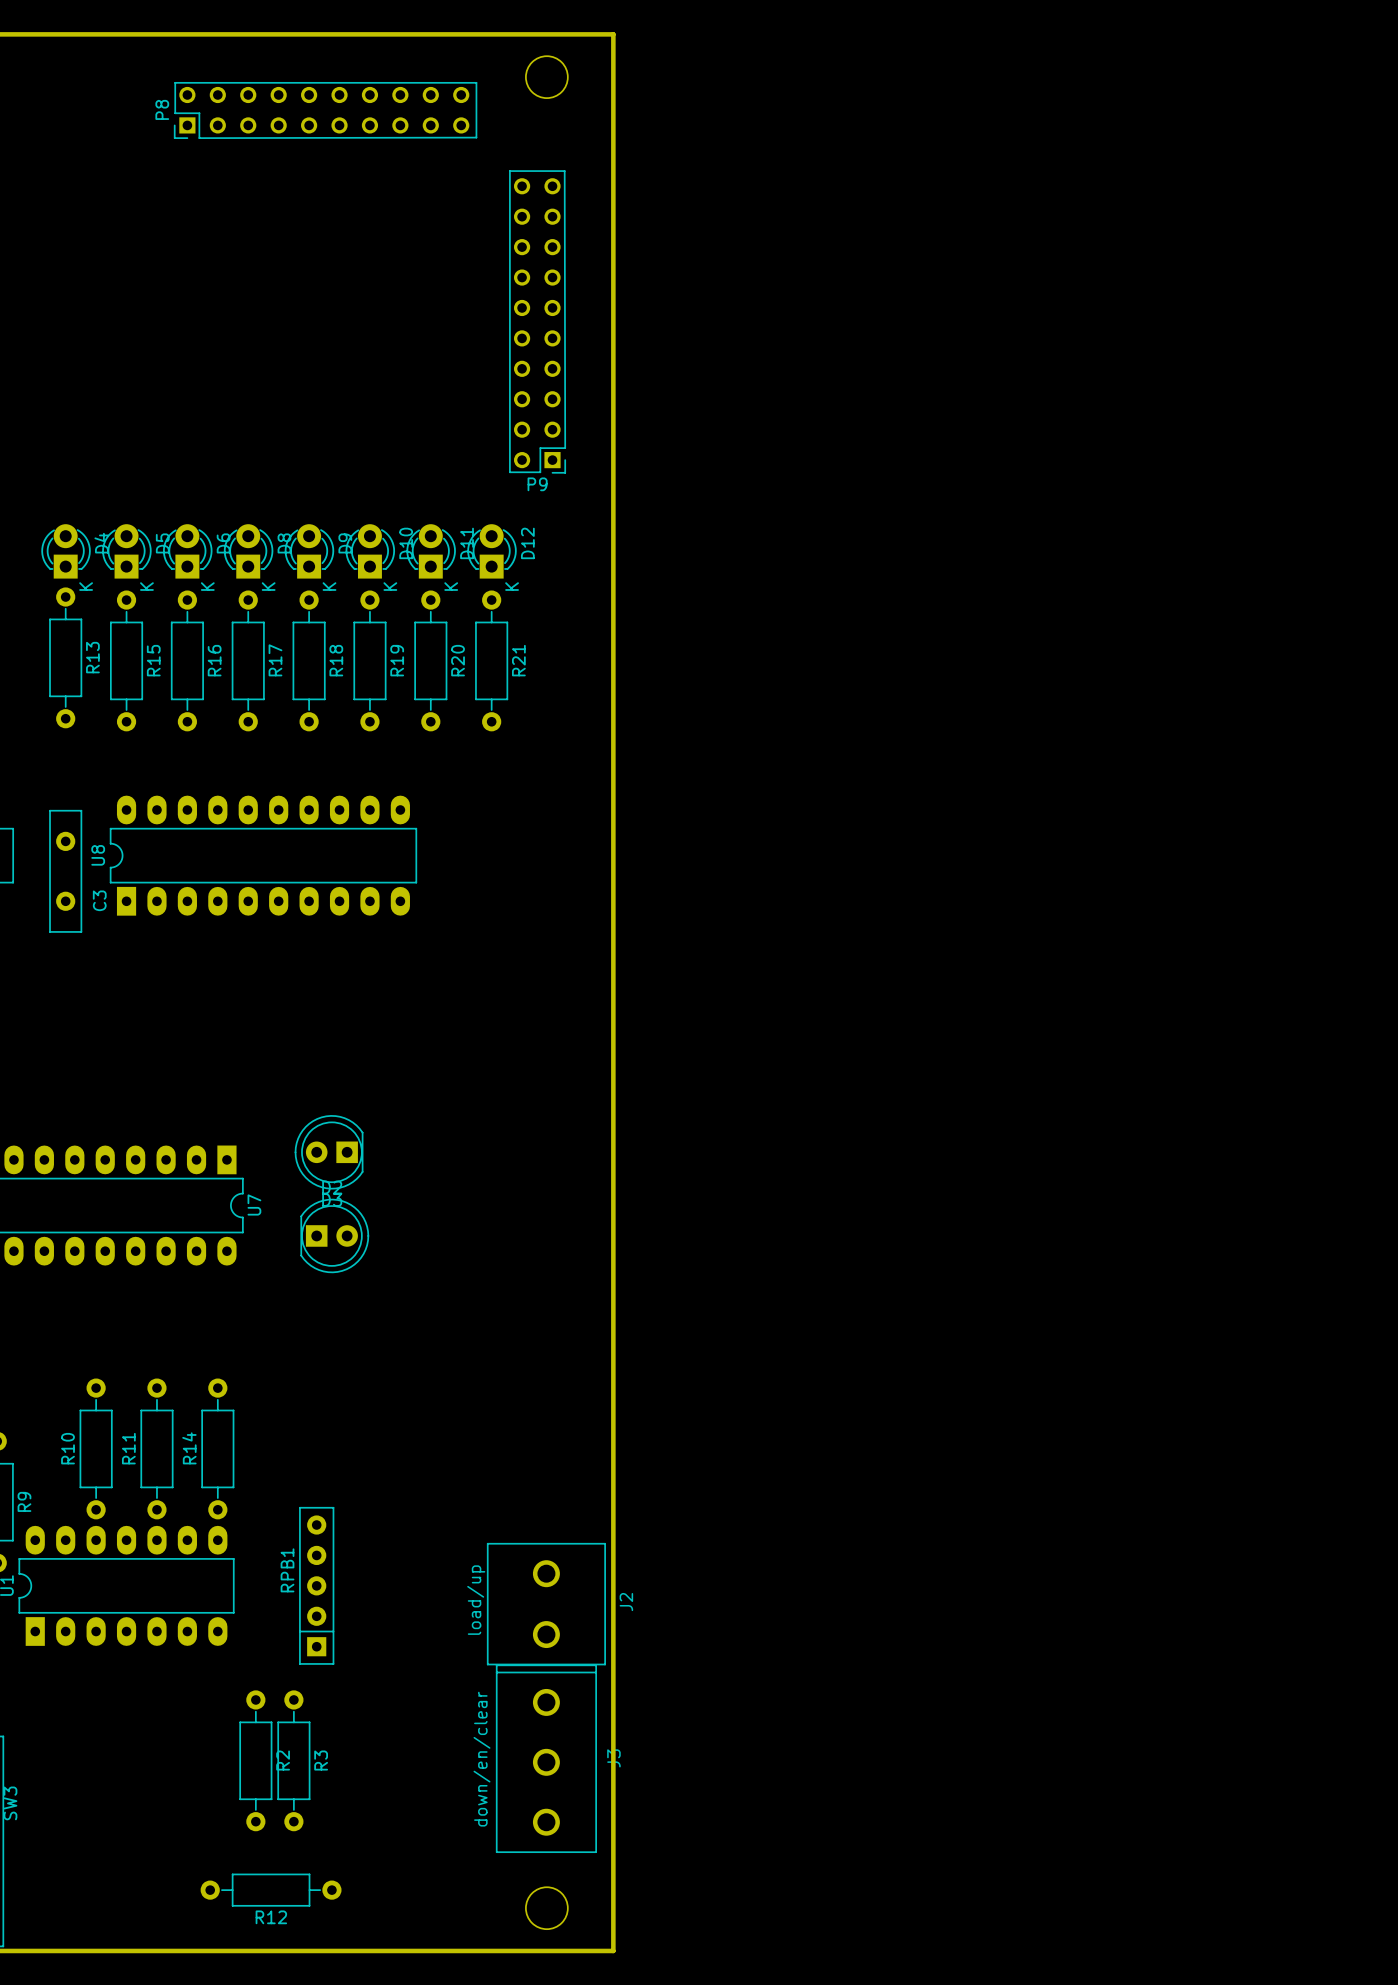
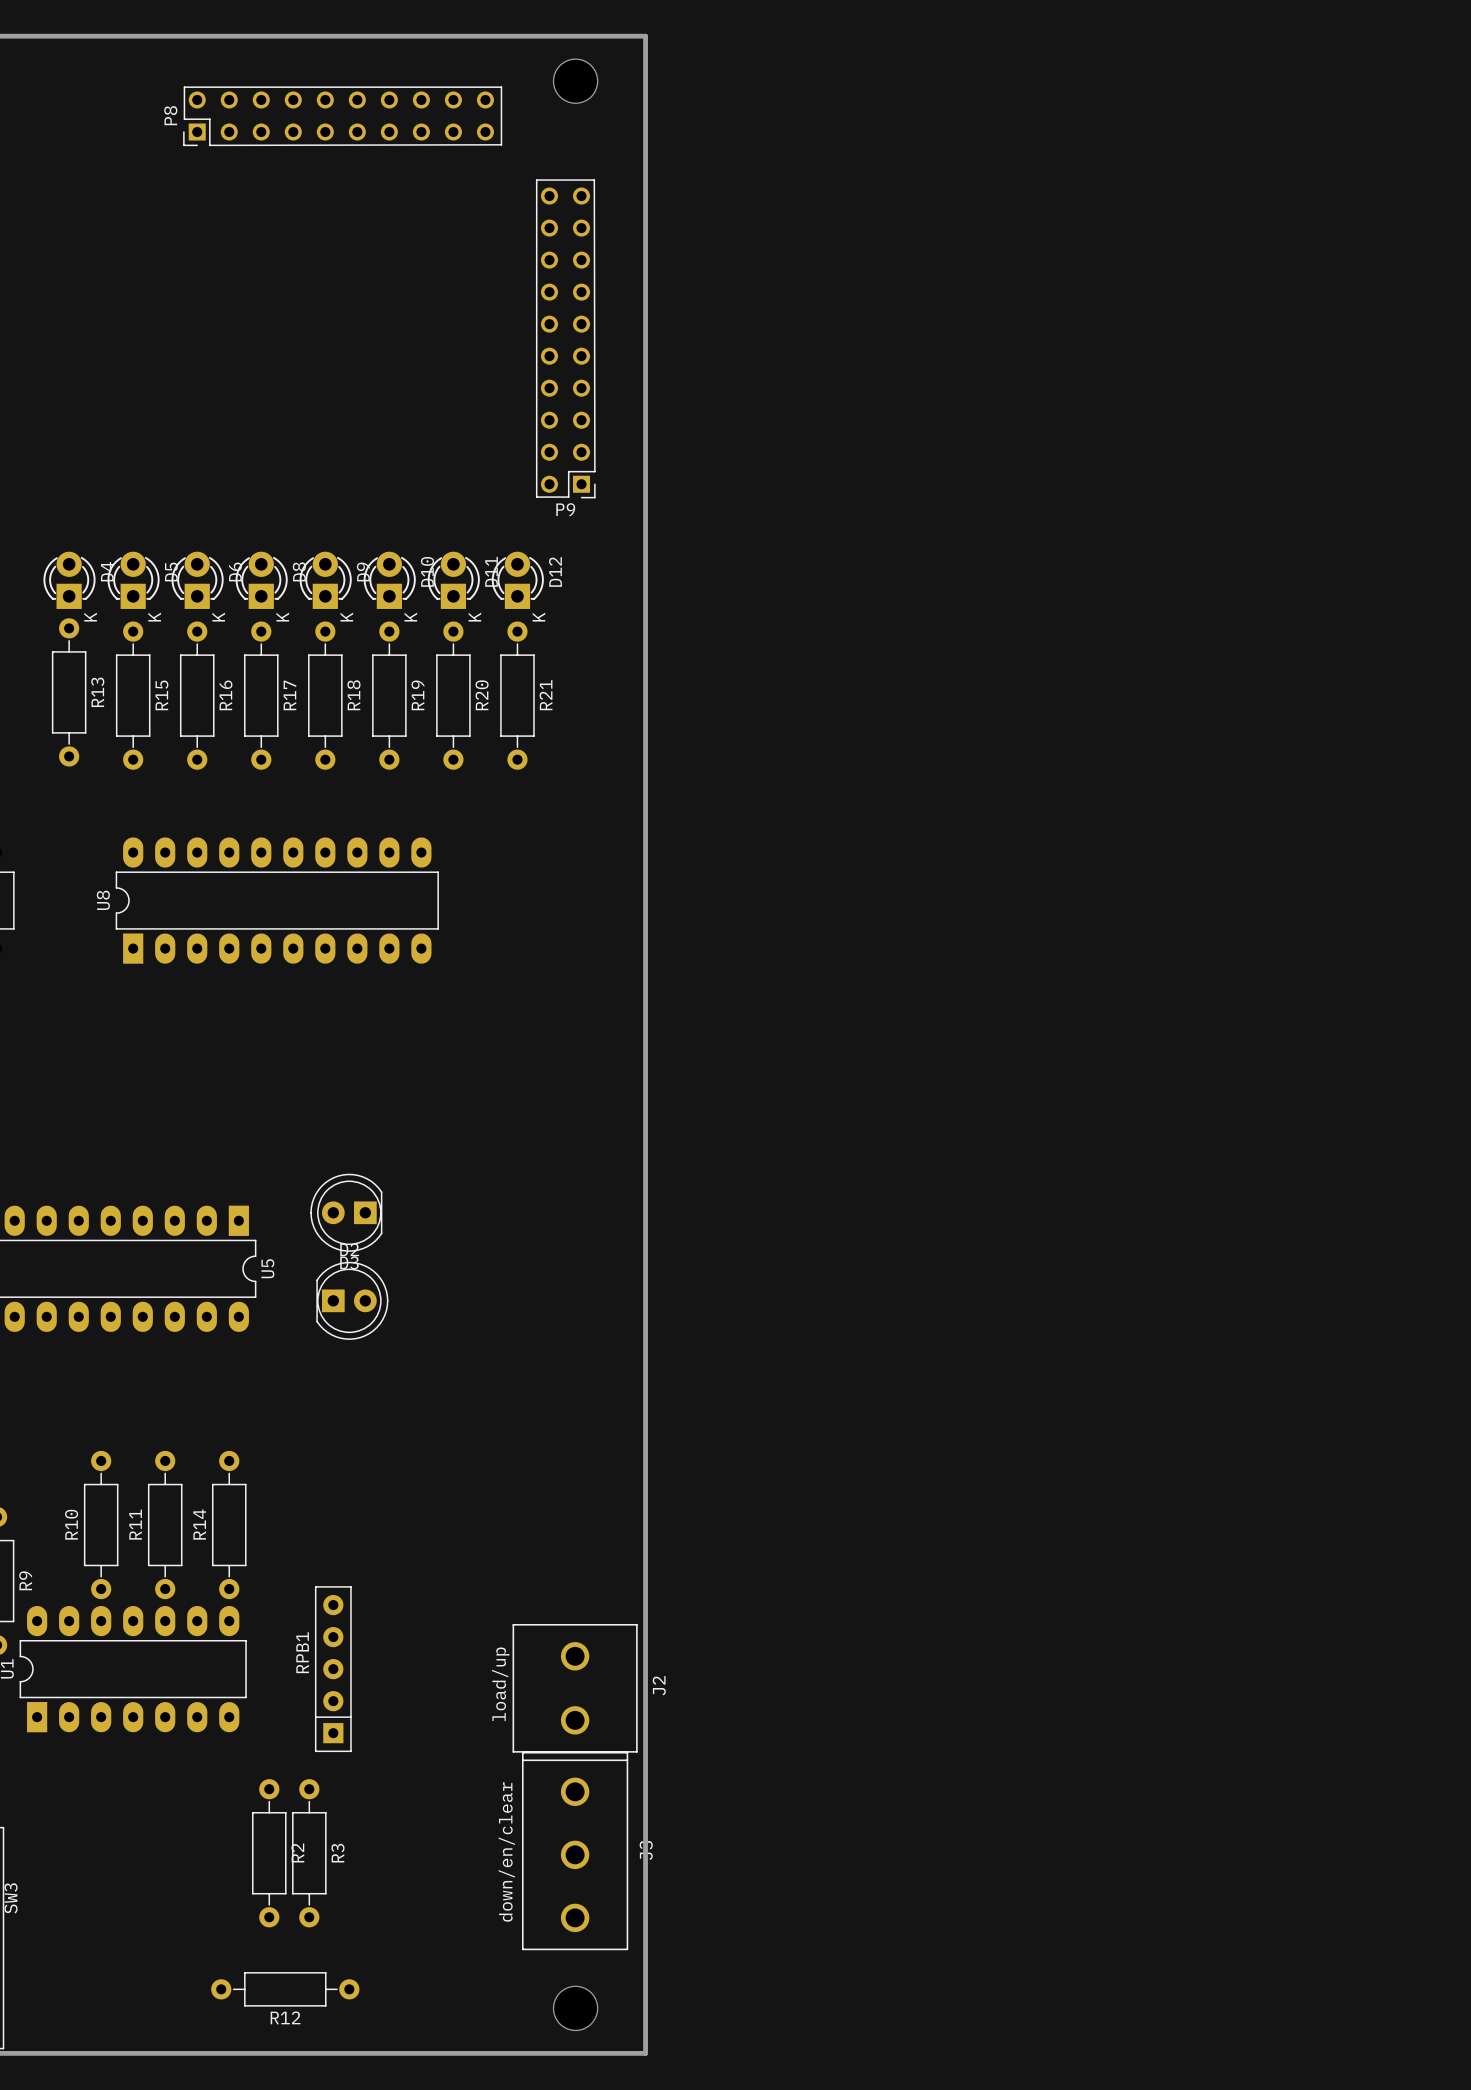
C3: (65, 871) -> none
U7 name: U7 (254, 1204) -> U5 (267, 1268)

